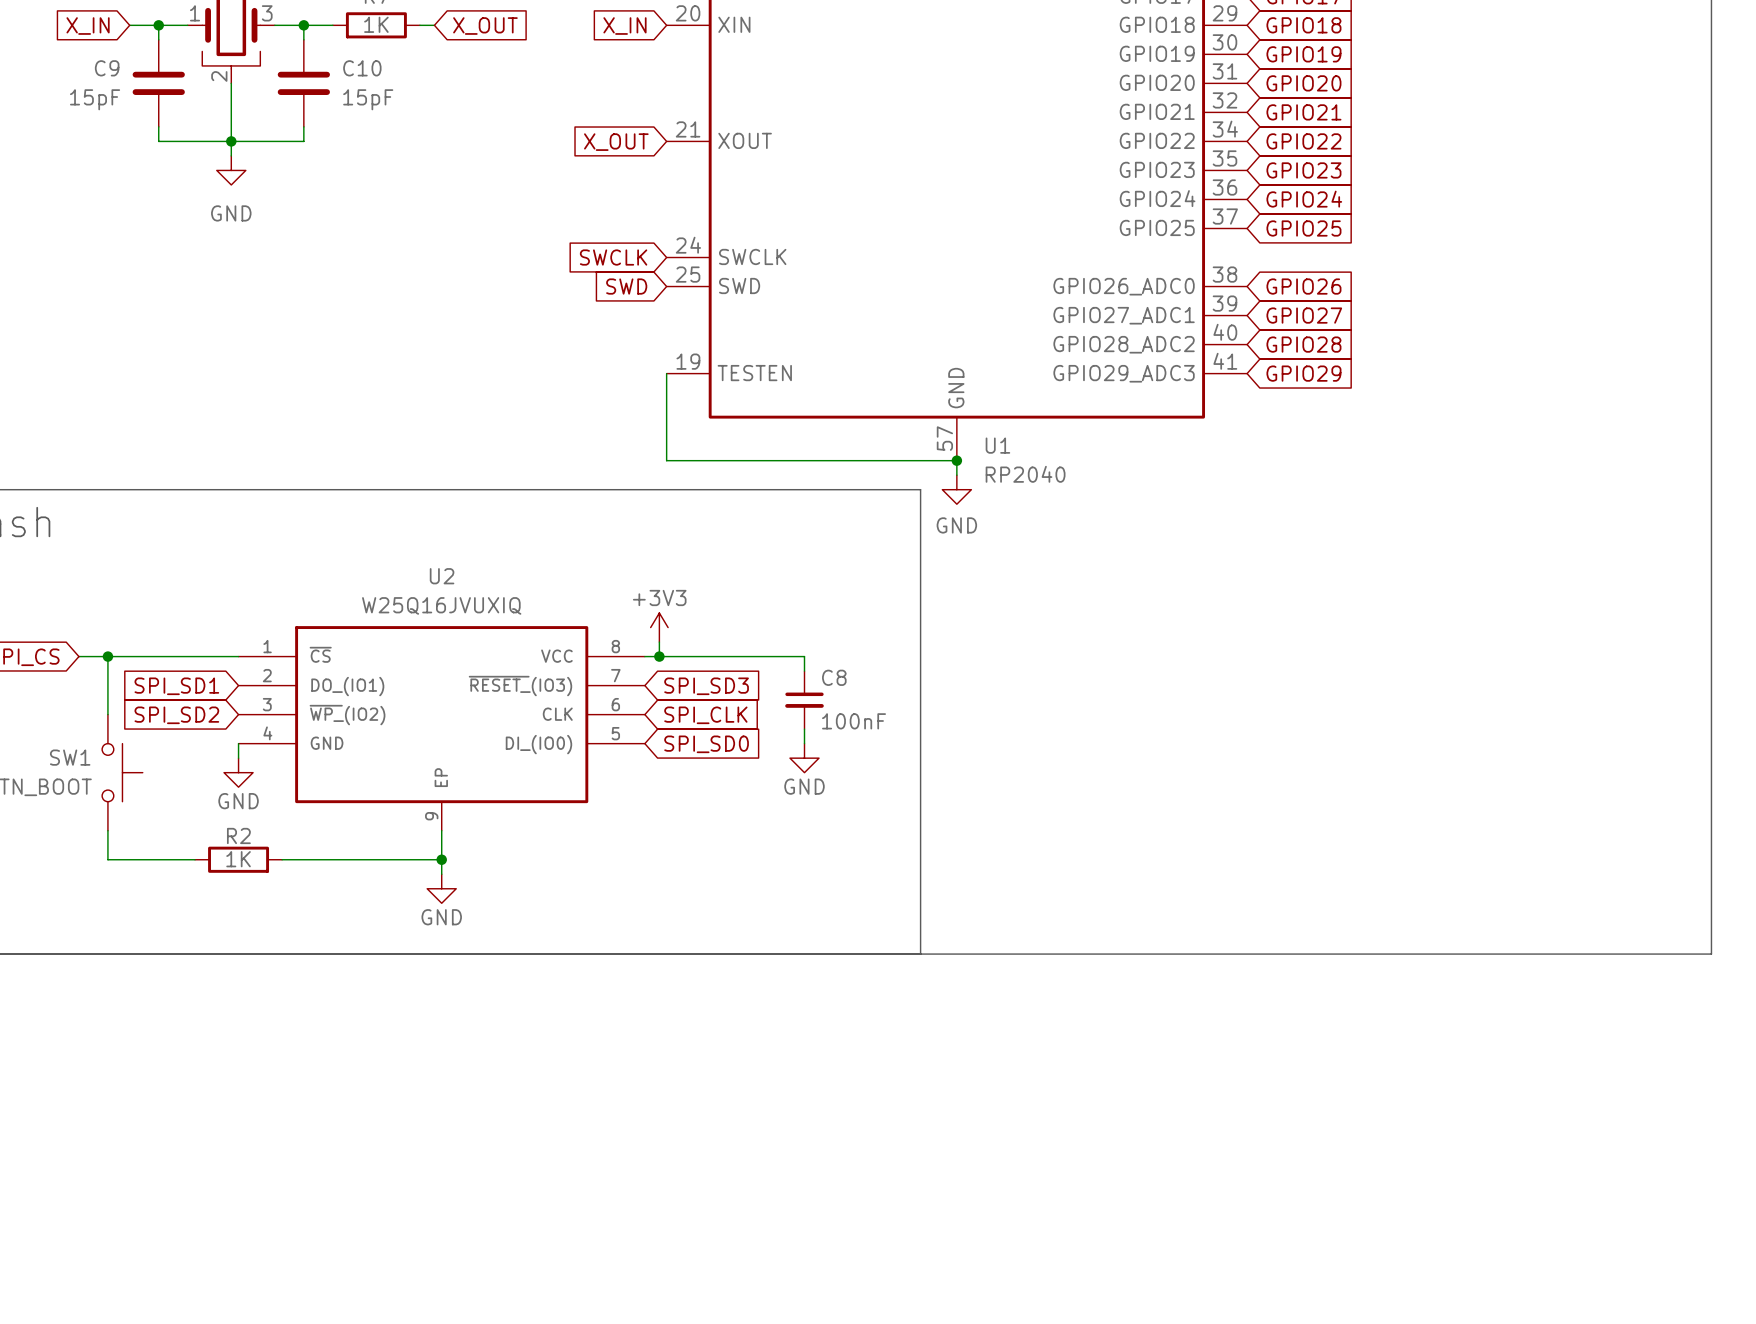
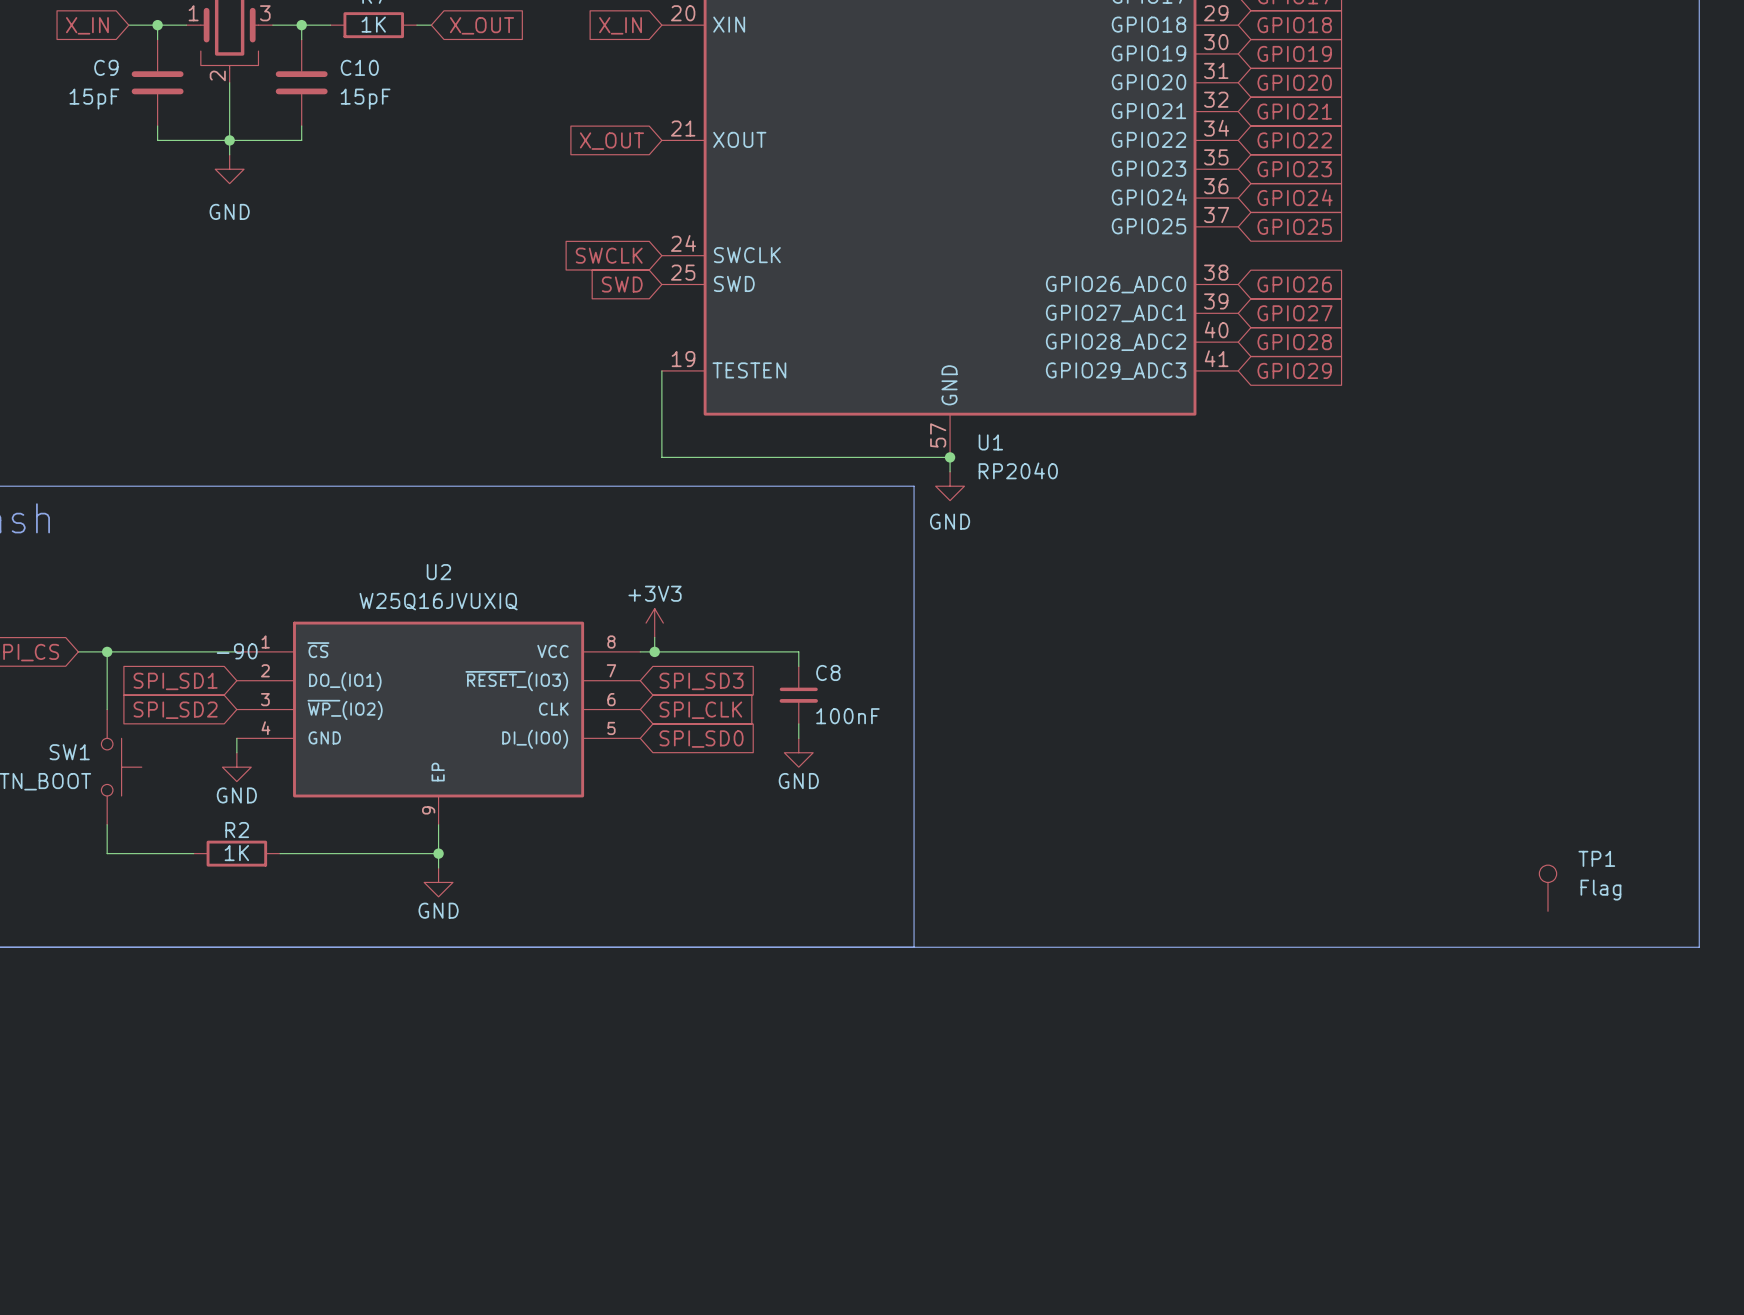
U2 text: none -> -90 (237, 651)
TP1: none -> Flag (1547, 888)

